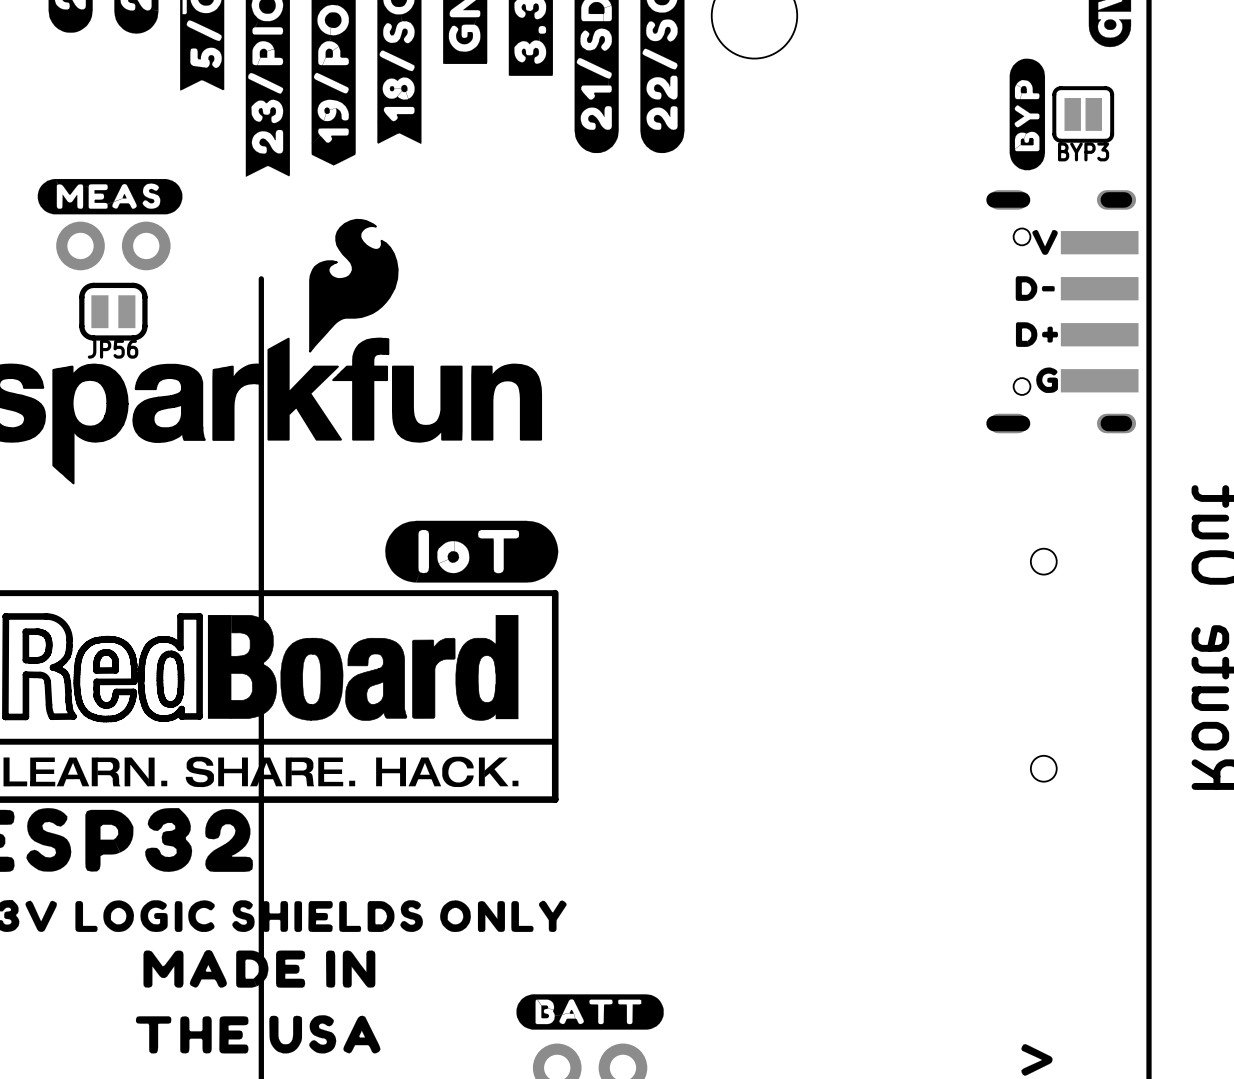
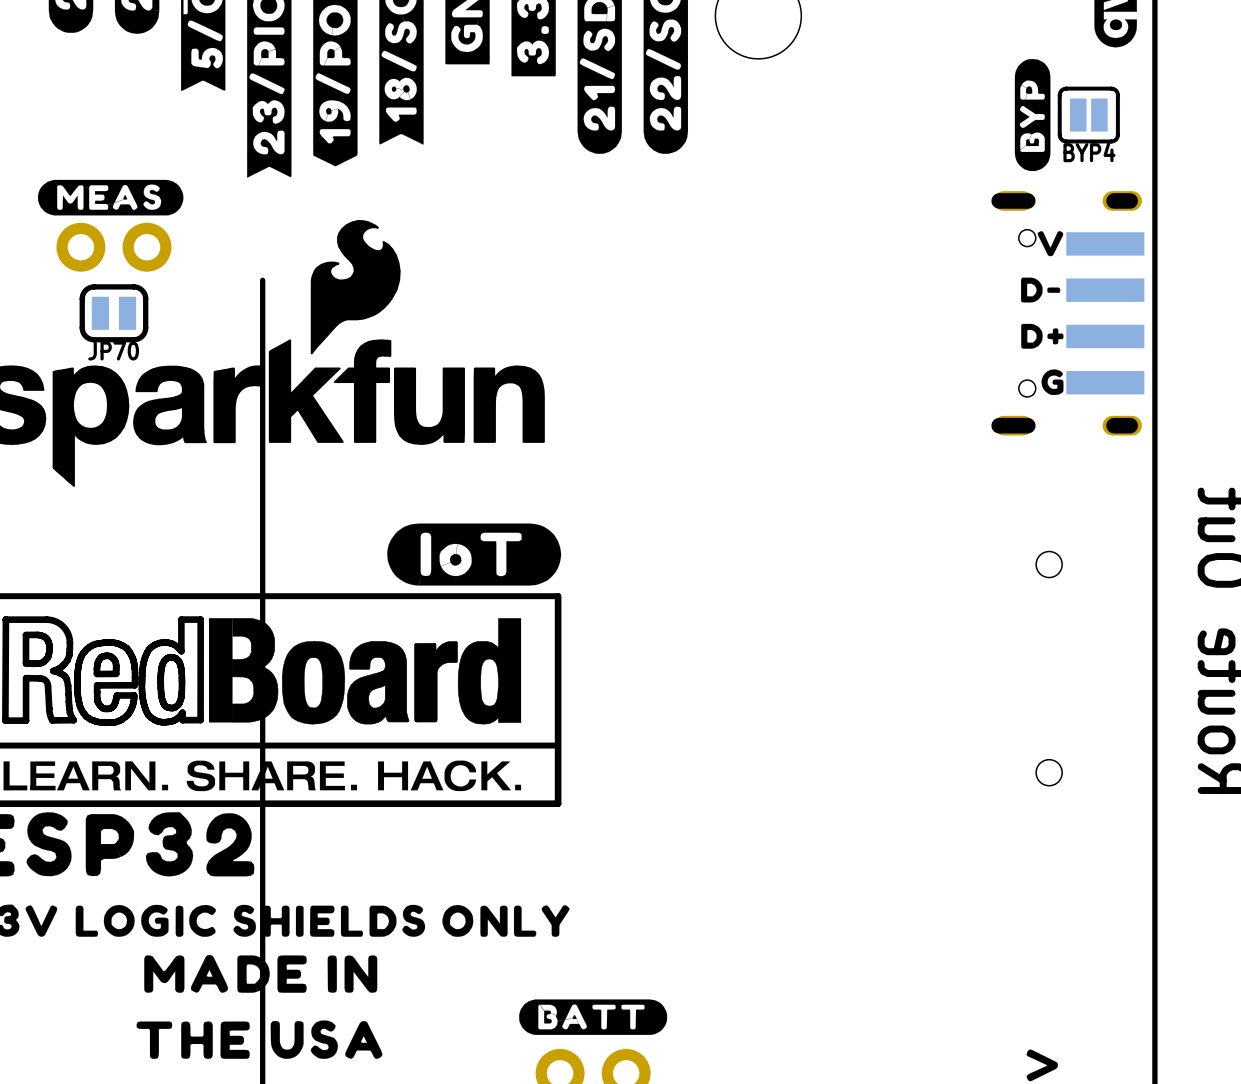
BYP3 name: BYP3 (1083, 151) -> BYP4 (1089, 152)
JP56 name: JP56 (113, 349) -> JP70 (113, 350)

